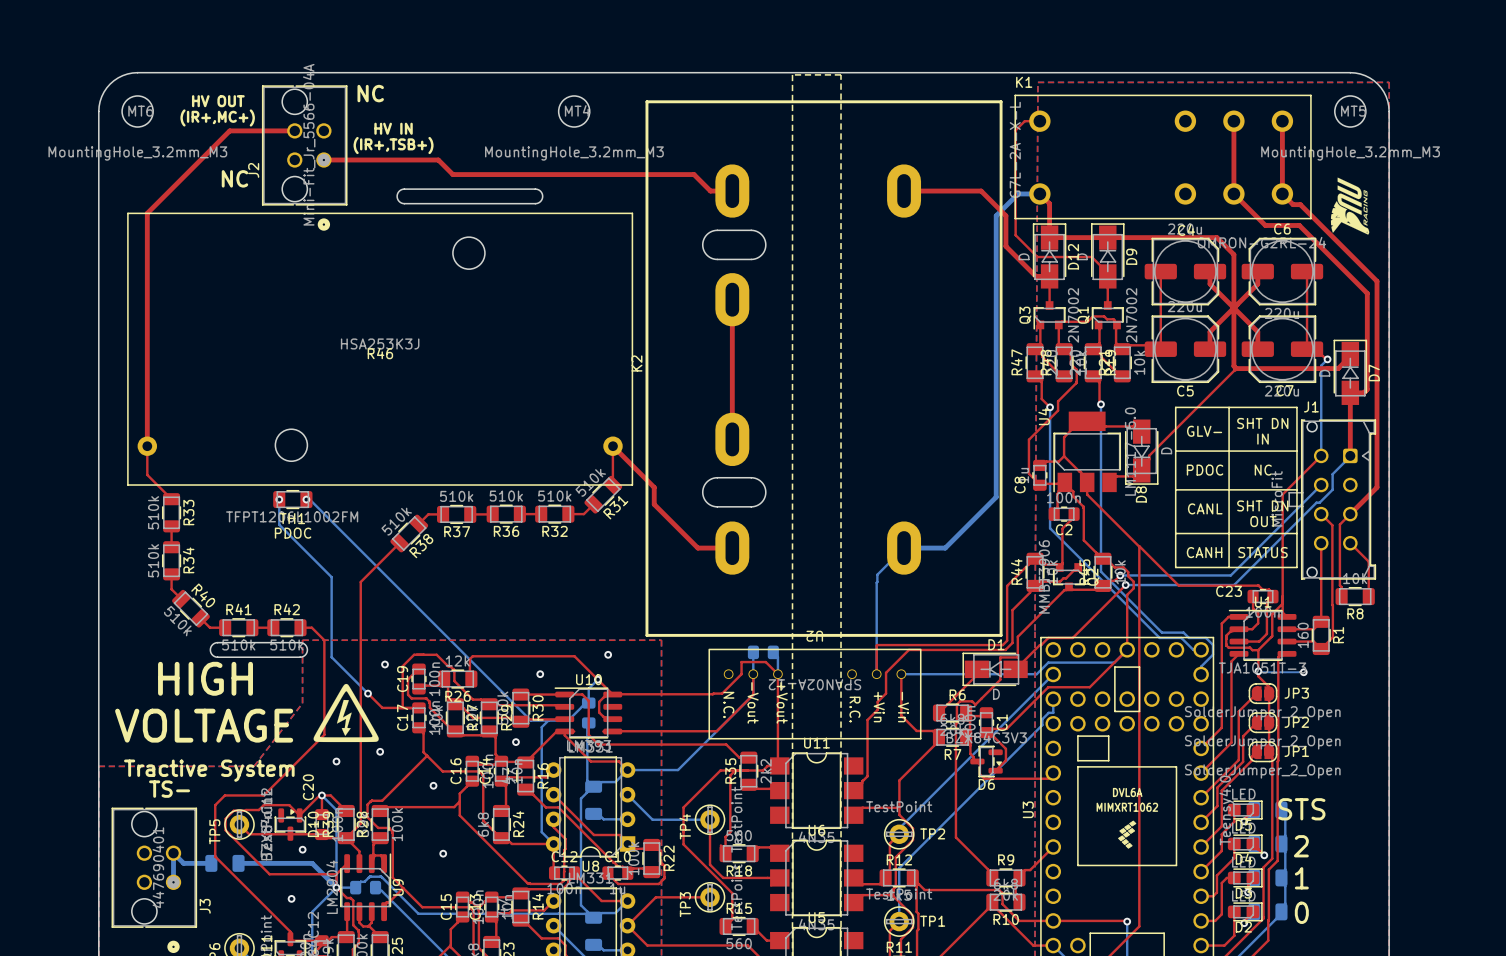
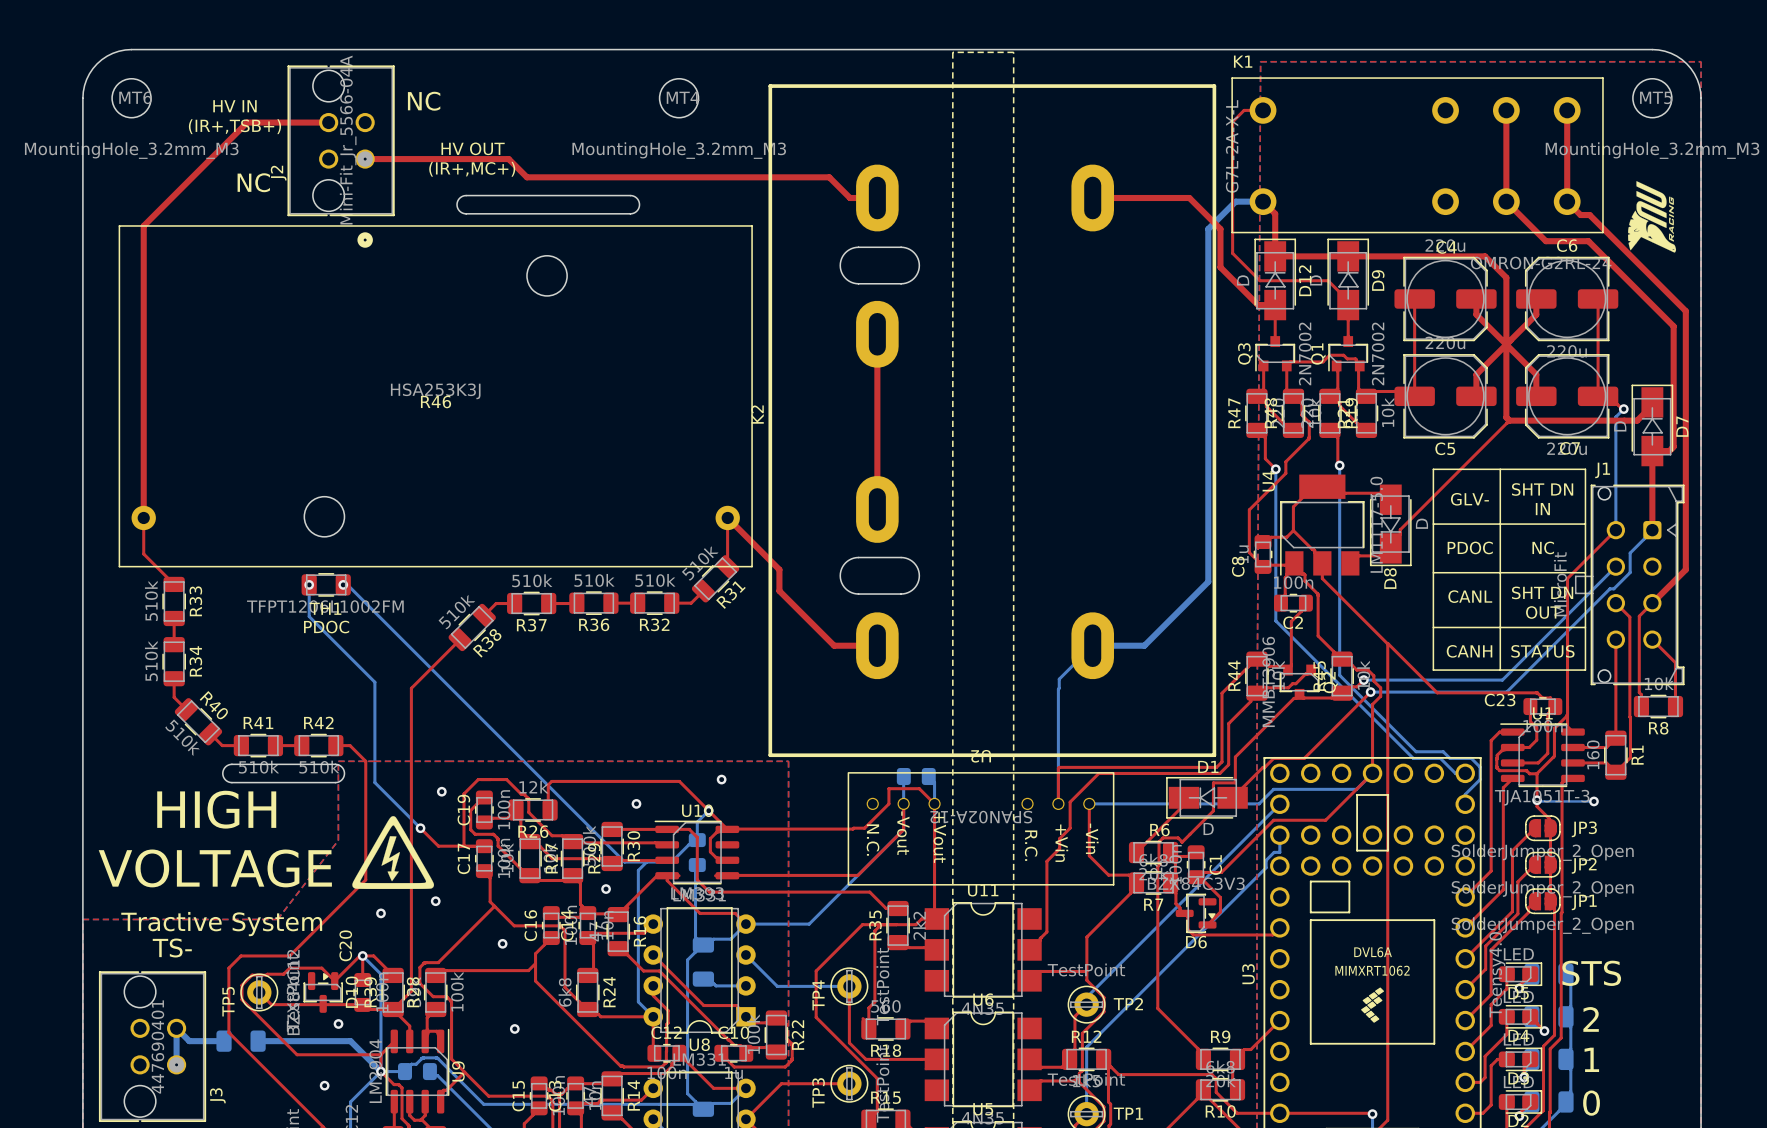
text position: NC (370, 93) -> NC (424, 101)
text position: HV OUT (218, 101) -> HV OUT (473, 148)
text position: (IR+,MC+) (217, 117) -> (IR+,MC+) (472, 169)
text position: HV IN (393, 128) -> HV IN (234, 106)
text position: (IR+,TSB+) (393, 145) -> (IR+,TSB+) (234, 126)

